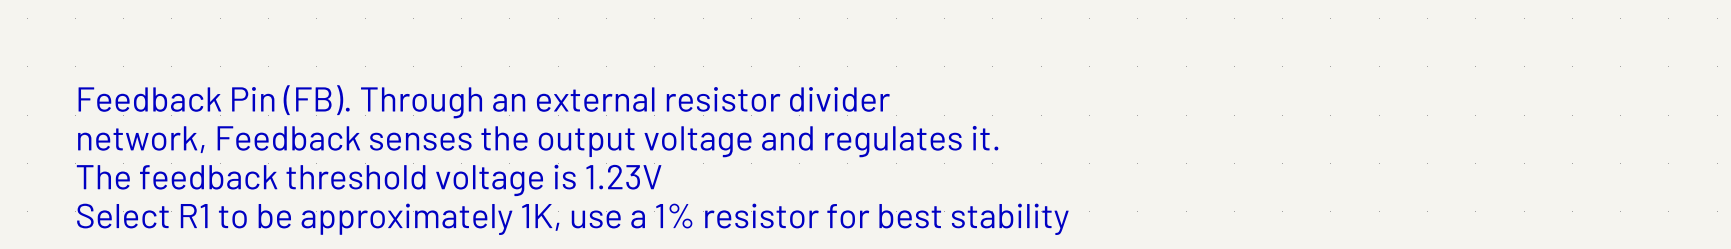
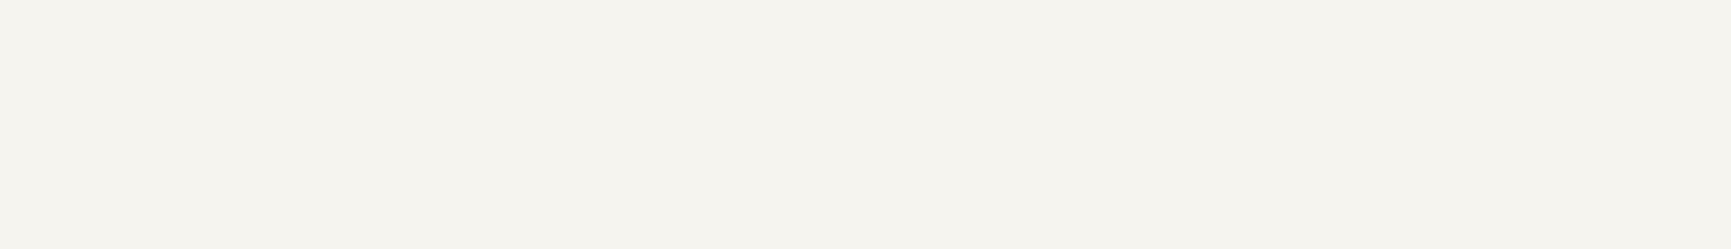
text: Feedback Pin (FB). Through an external resistor divider (484, 101) -> none
text: network, Feedback senses the output voltage and regulates it. (538, 141) -> none
text: The feedback threshold voltage is 1.23V (369, 180) -> none
text: Select R1 to be approximately 1K, use a 1% resistor for best stability (572, 219) -> none

